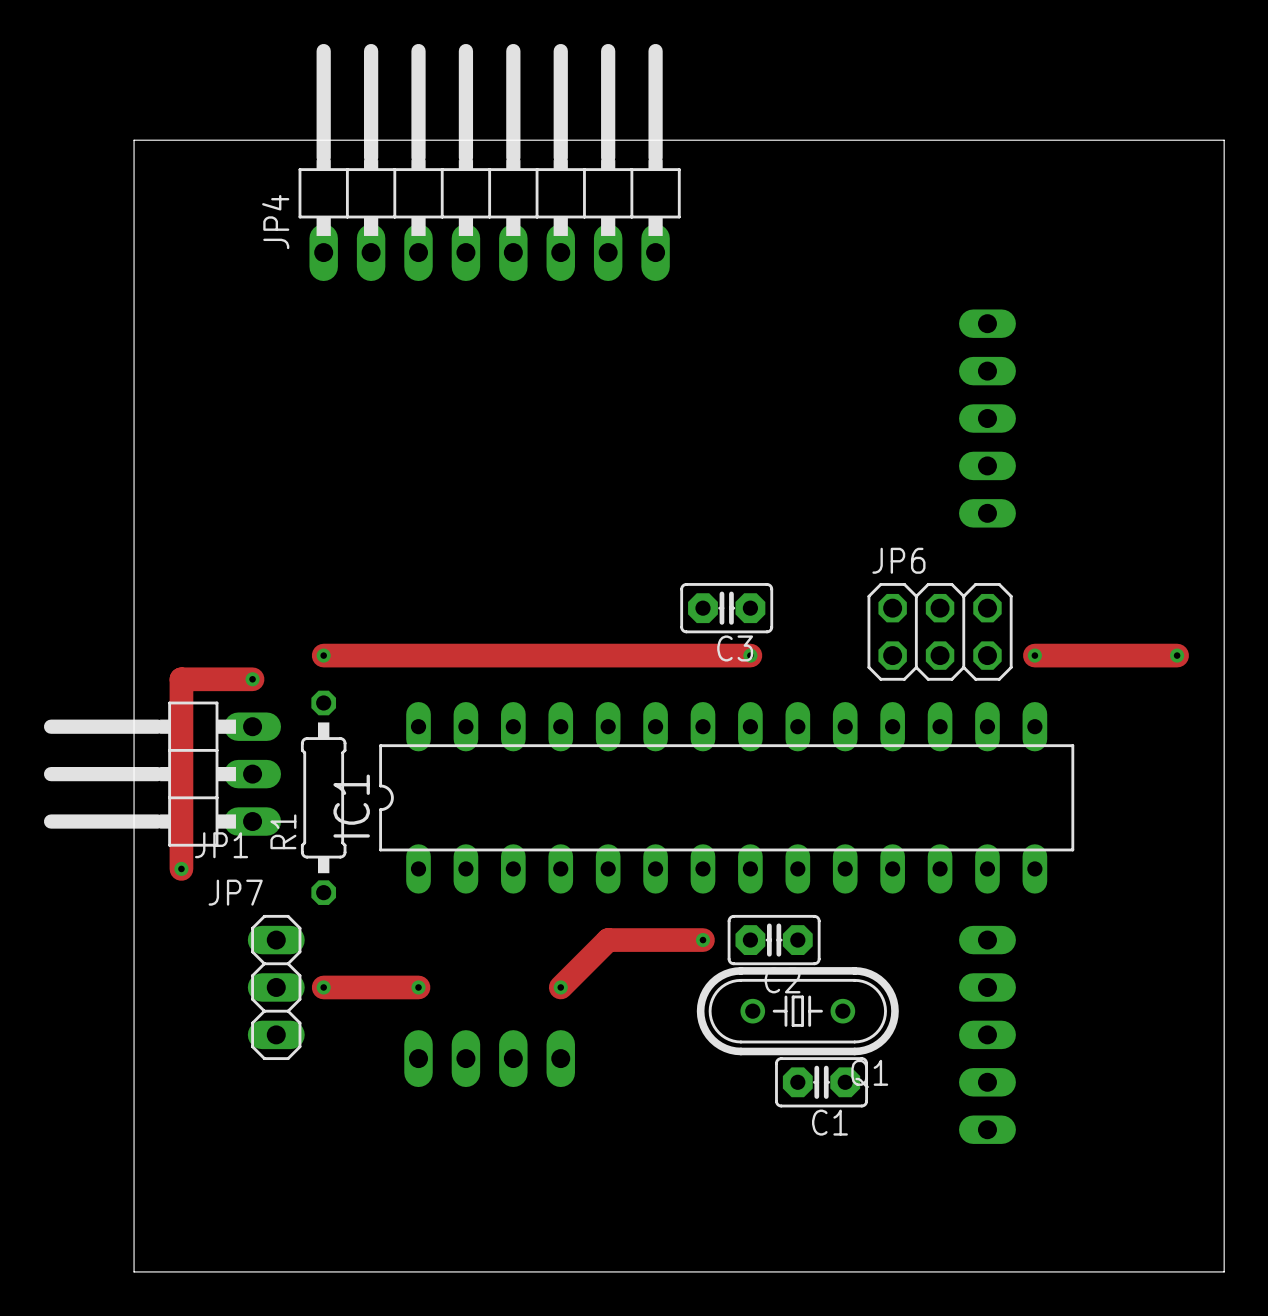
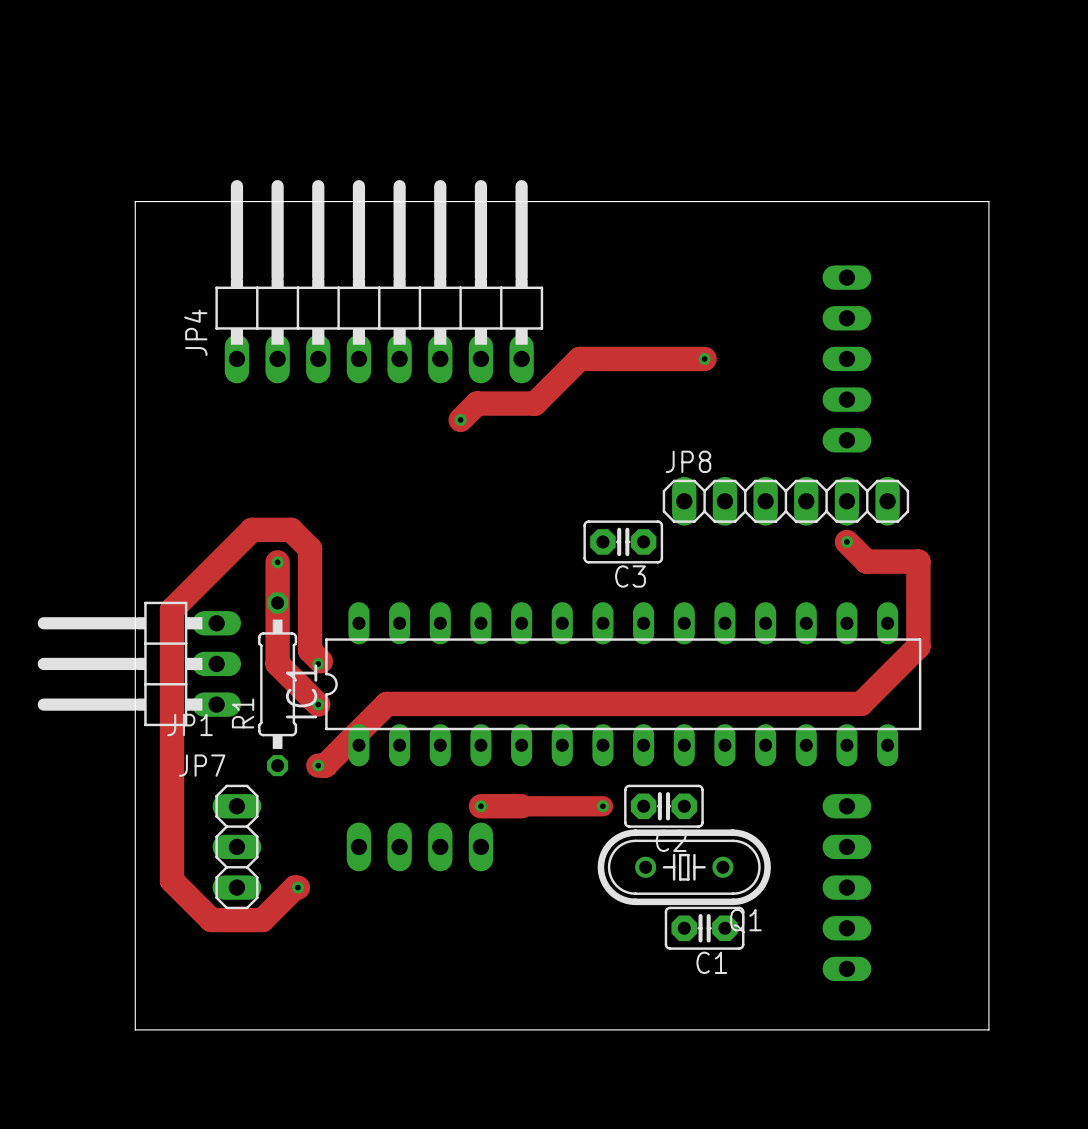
board edge: (134, 140) (1224, 140) (1224, 1271) (134, 1271) (134, 140) -> (135, 201) (135, 1029) (988, 1029) (988, 201) (135, 201)
JP4 position: (489, 162) -> (379, 281)
track: none -> (704, 358) (579, 358) (535, 403) (477, 403) (460, 419)
via: none -> (704, 358)
via: none -> (460, 419)
JP8: none -> (785, 501)
C3 position: (726, 608) -> (623, 541)
JP6: (940, 631) -> none
track: none -> (846, 541) (866, 561) (918, 561) (918, 646) (861, 703) (386, 703) (325, 765) (318, 765)
track: (323, 655) (750, 655) -> (277, 562) (277, 663) (318, 704)
via: (750, 655) -> none
track: (1034, 655) (1177, 655) -> none
via position: (1034, 655) -> (846, 541)
via: (1177, 655) -> none
track: (252, 679) (181, 679) (181, 868) -> none
via: (252, 679) -> none
track: none -> (320, 661) (310, 650) (310, 548) (291, 529) (252, 529) (172, 609) (172, 880) (211, 920) (262, 920) (294, 887) (297, 887)
via: none -> (318, 663)
via: none -> (318, 704)
via: (181, 868) -> none
via: none -> (318, 765)
track: (608, 940) (560, 987) -> (521, 806) (480, 806)
track: (323, 987) (418, 987) -> none
via: (323, 987) -> none
via: (418, 987) -> none
via position: (560, 987) -> (480, 806)
via: none -> (297, 887)
part position: (489, 1058) -> (419, 846)

